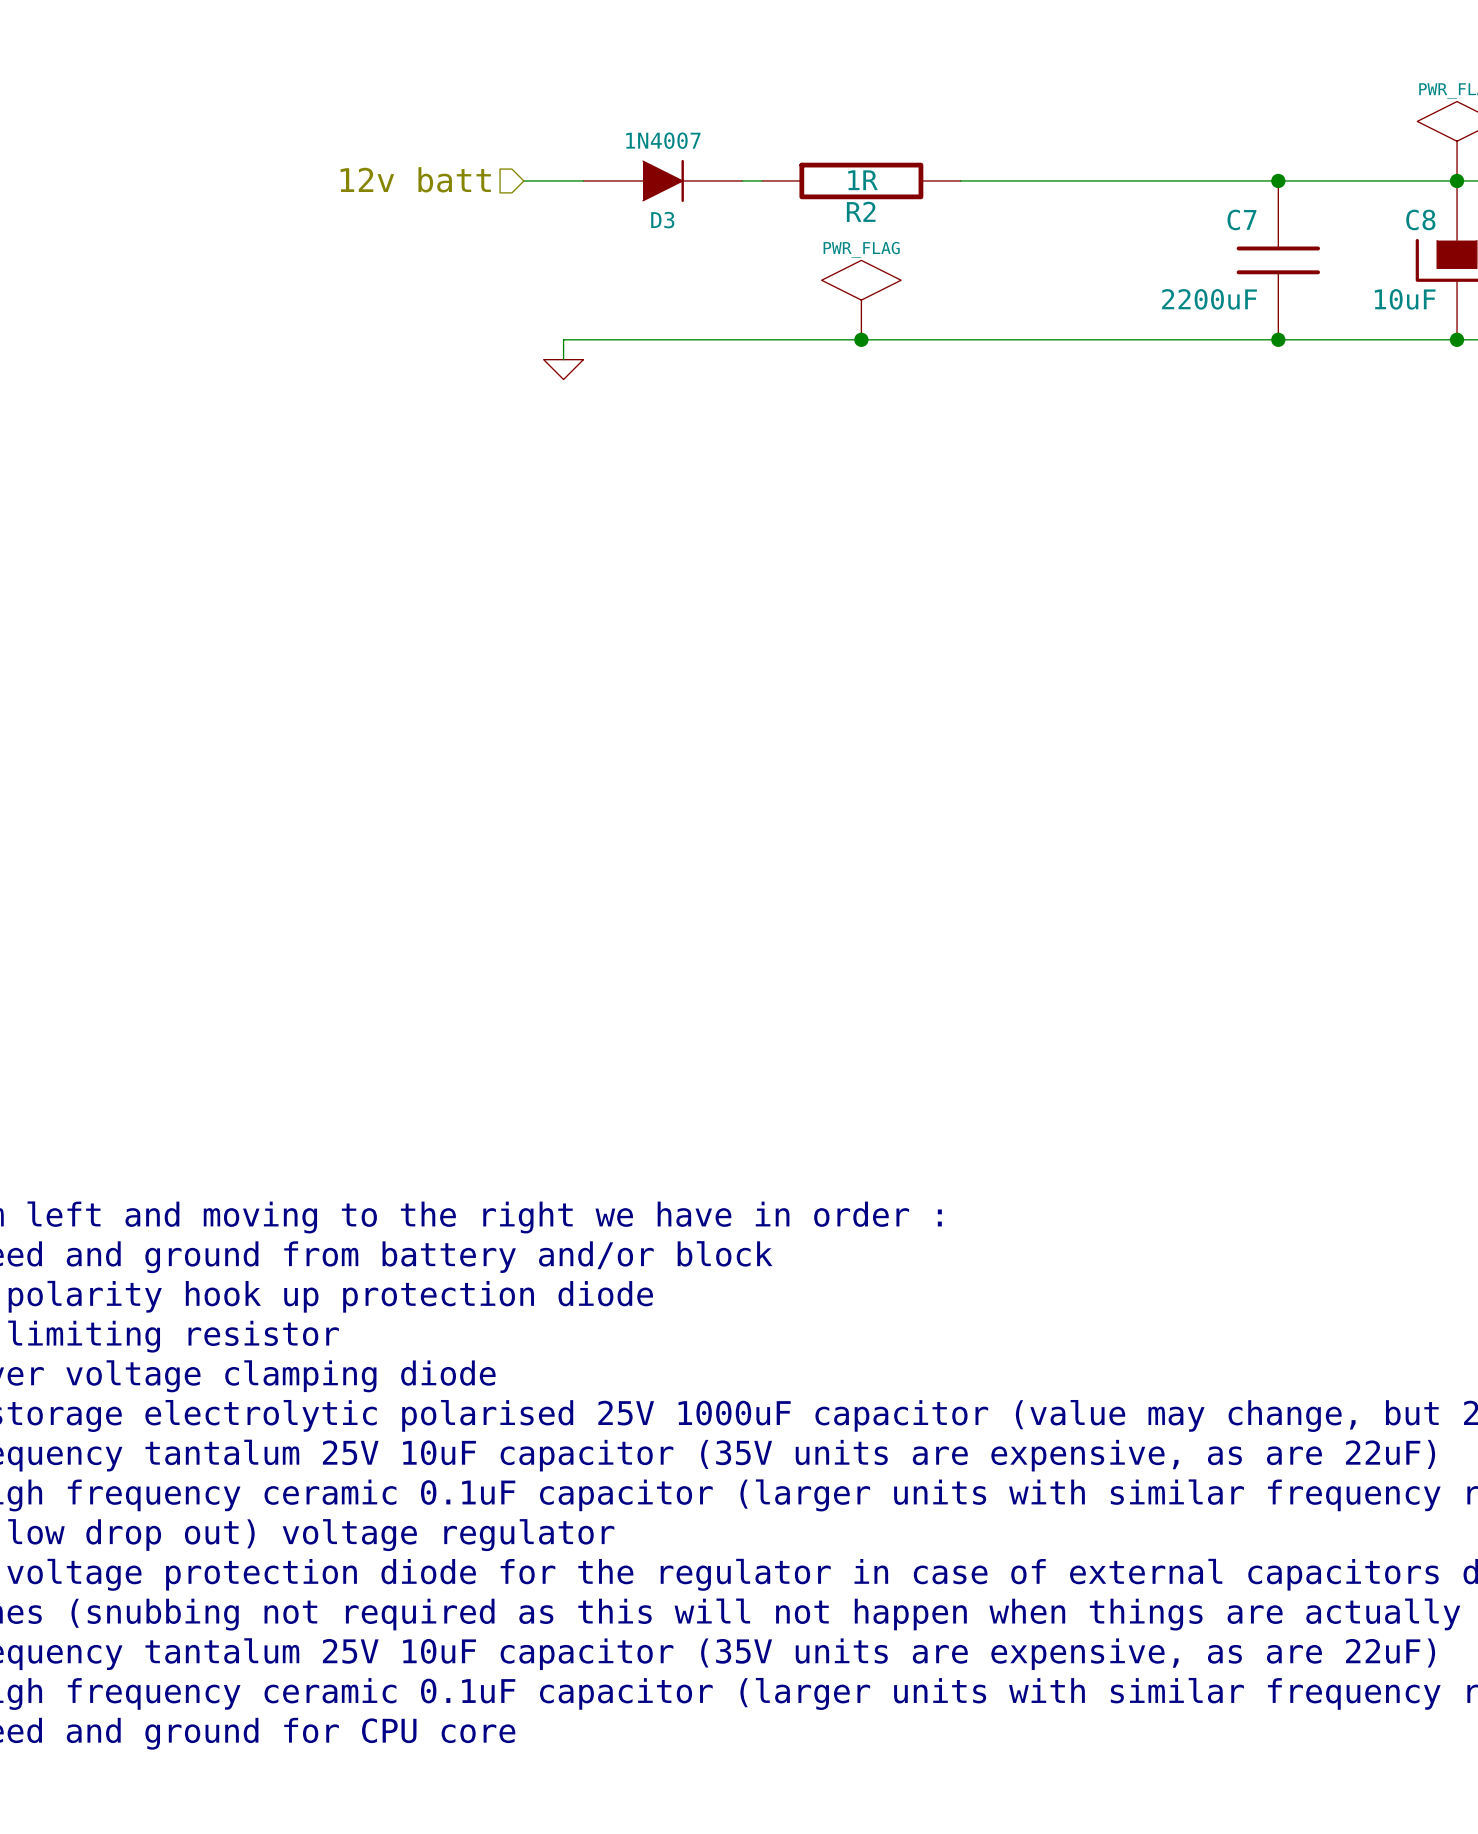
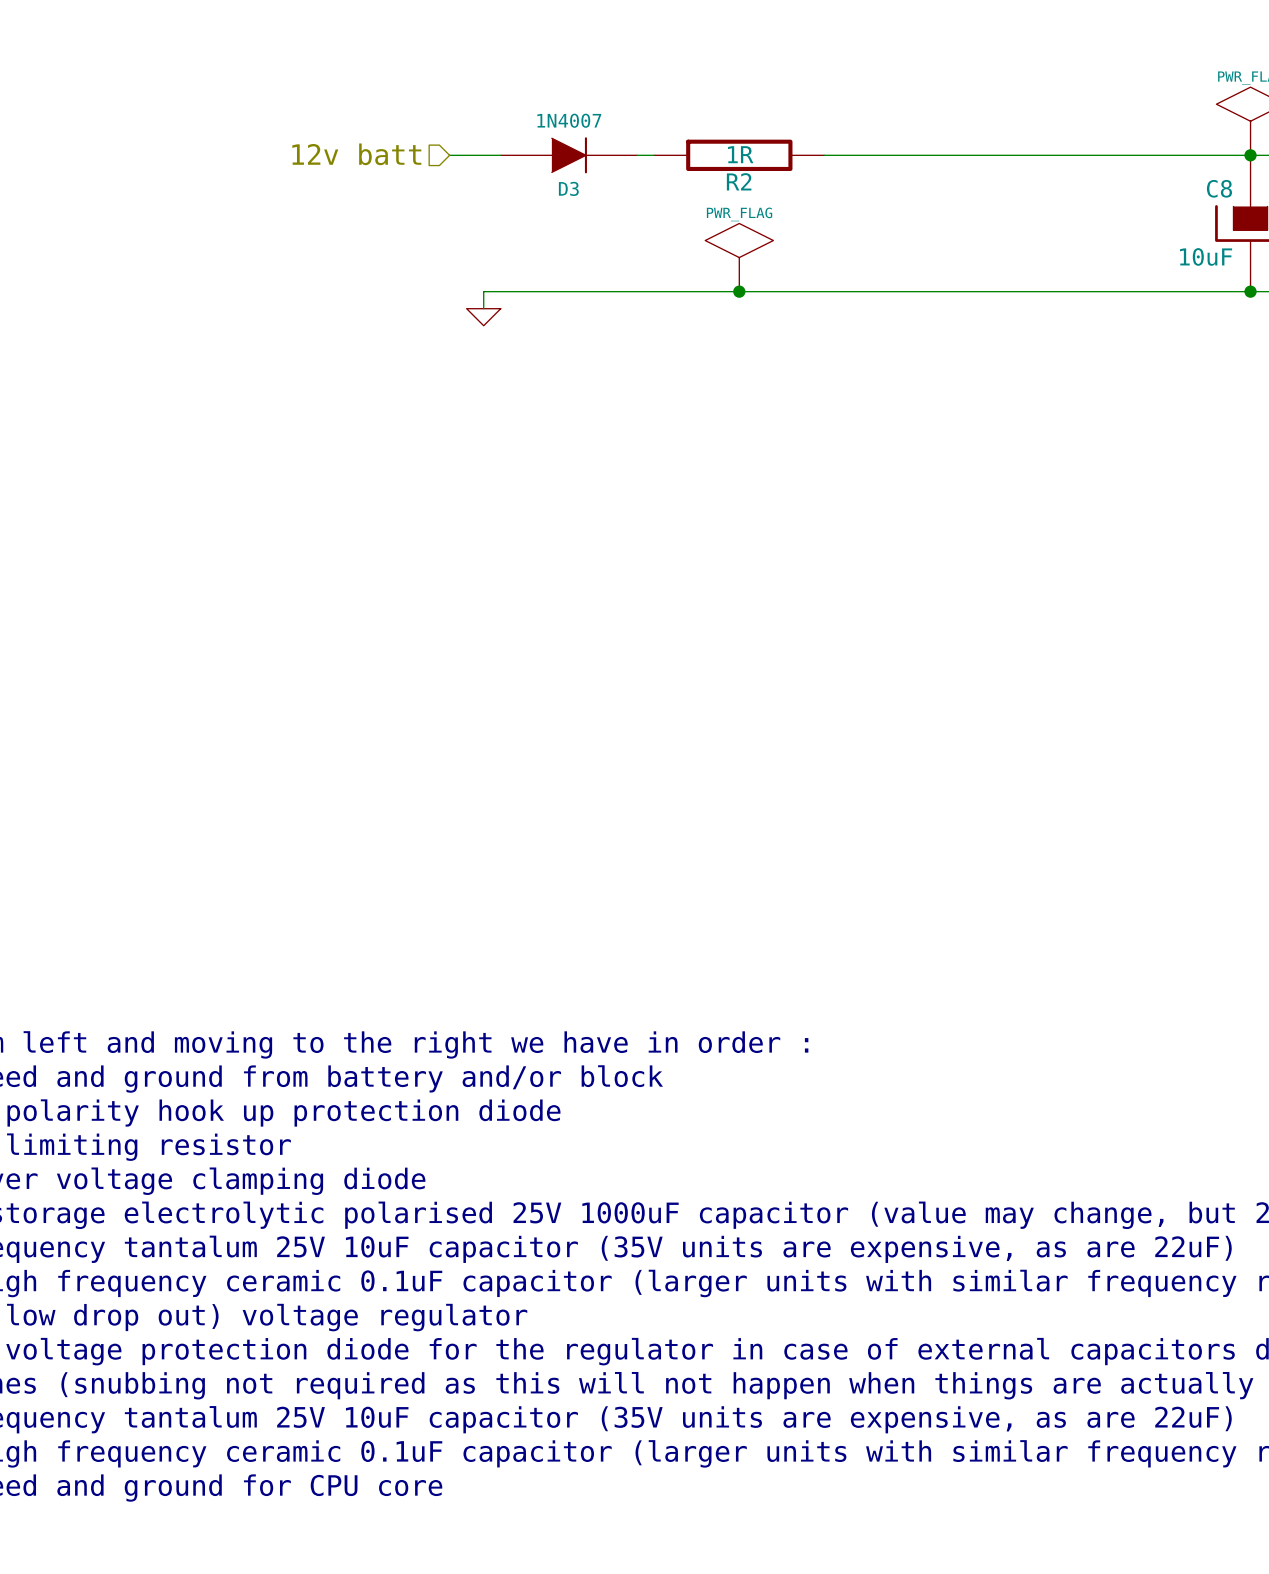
junction: (1278, 180) -> none
C7: 2200uF (1278, 260) -> none
junction: (1278, 339) -> none

